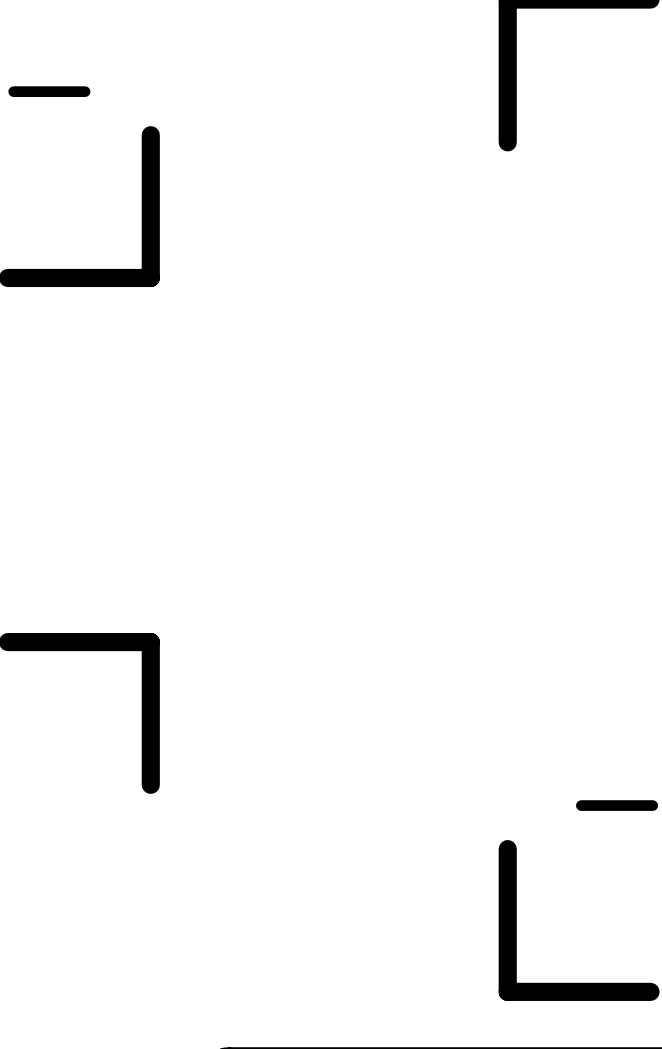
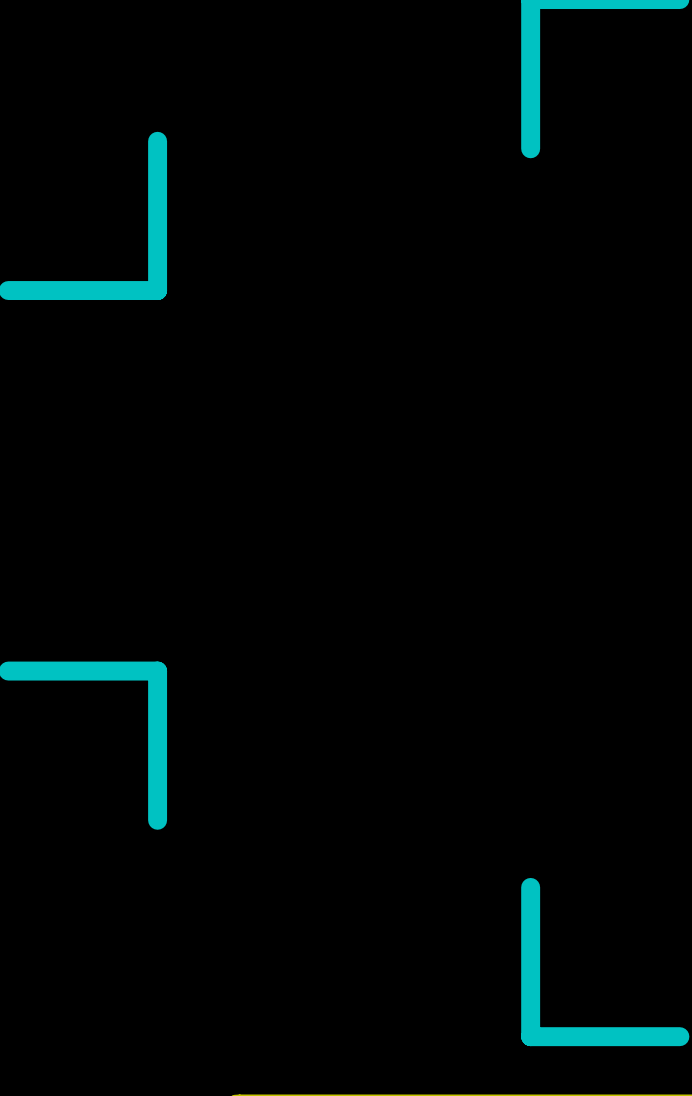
line: (85, 91) (13, 91) -> none
line: (652, 805) (581, 805) -> none

